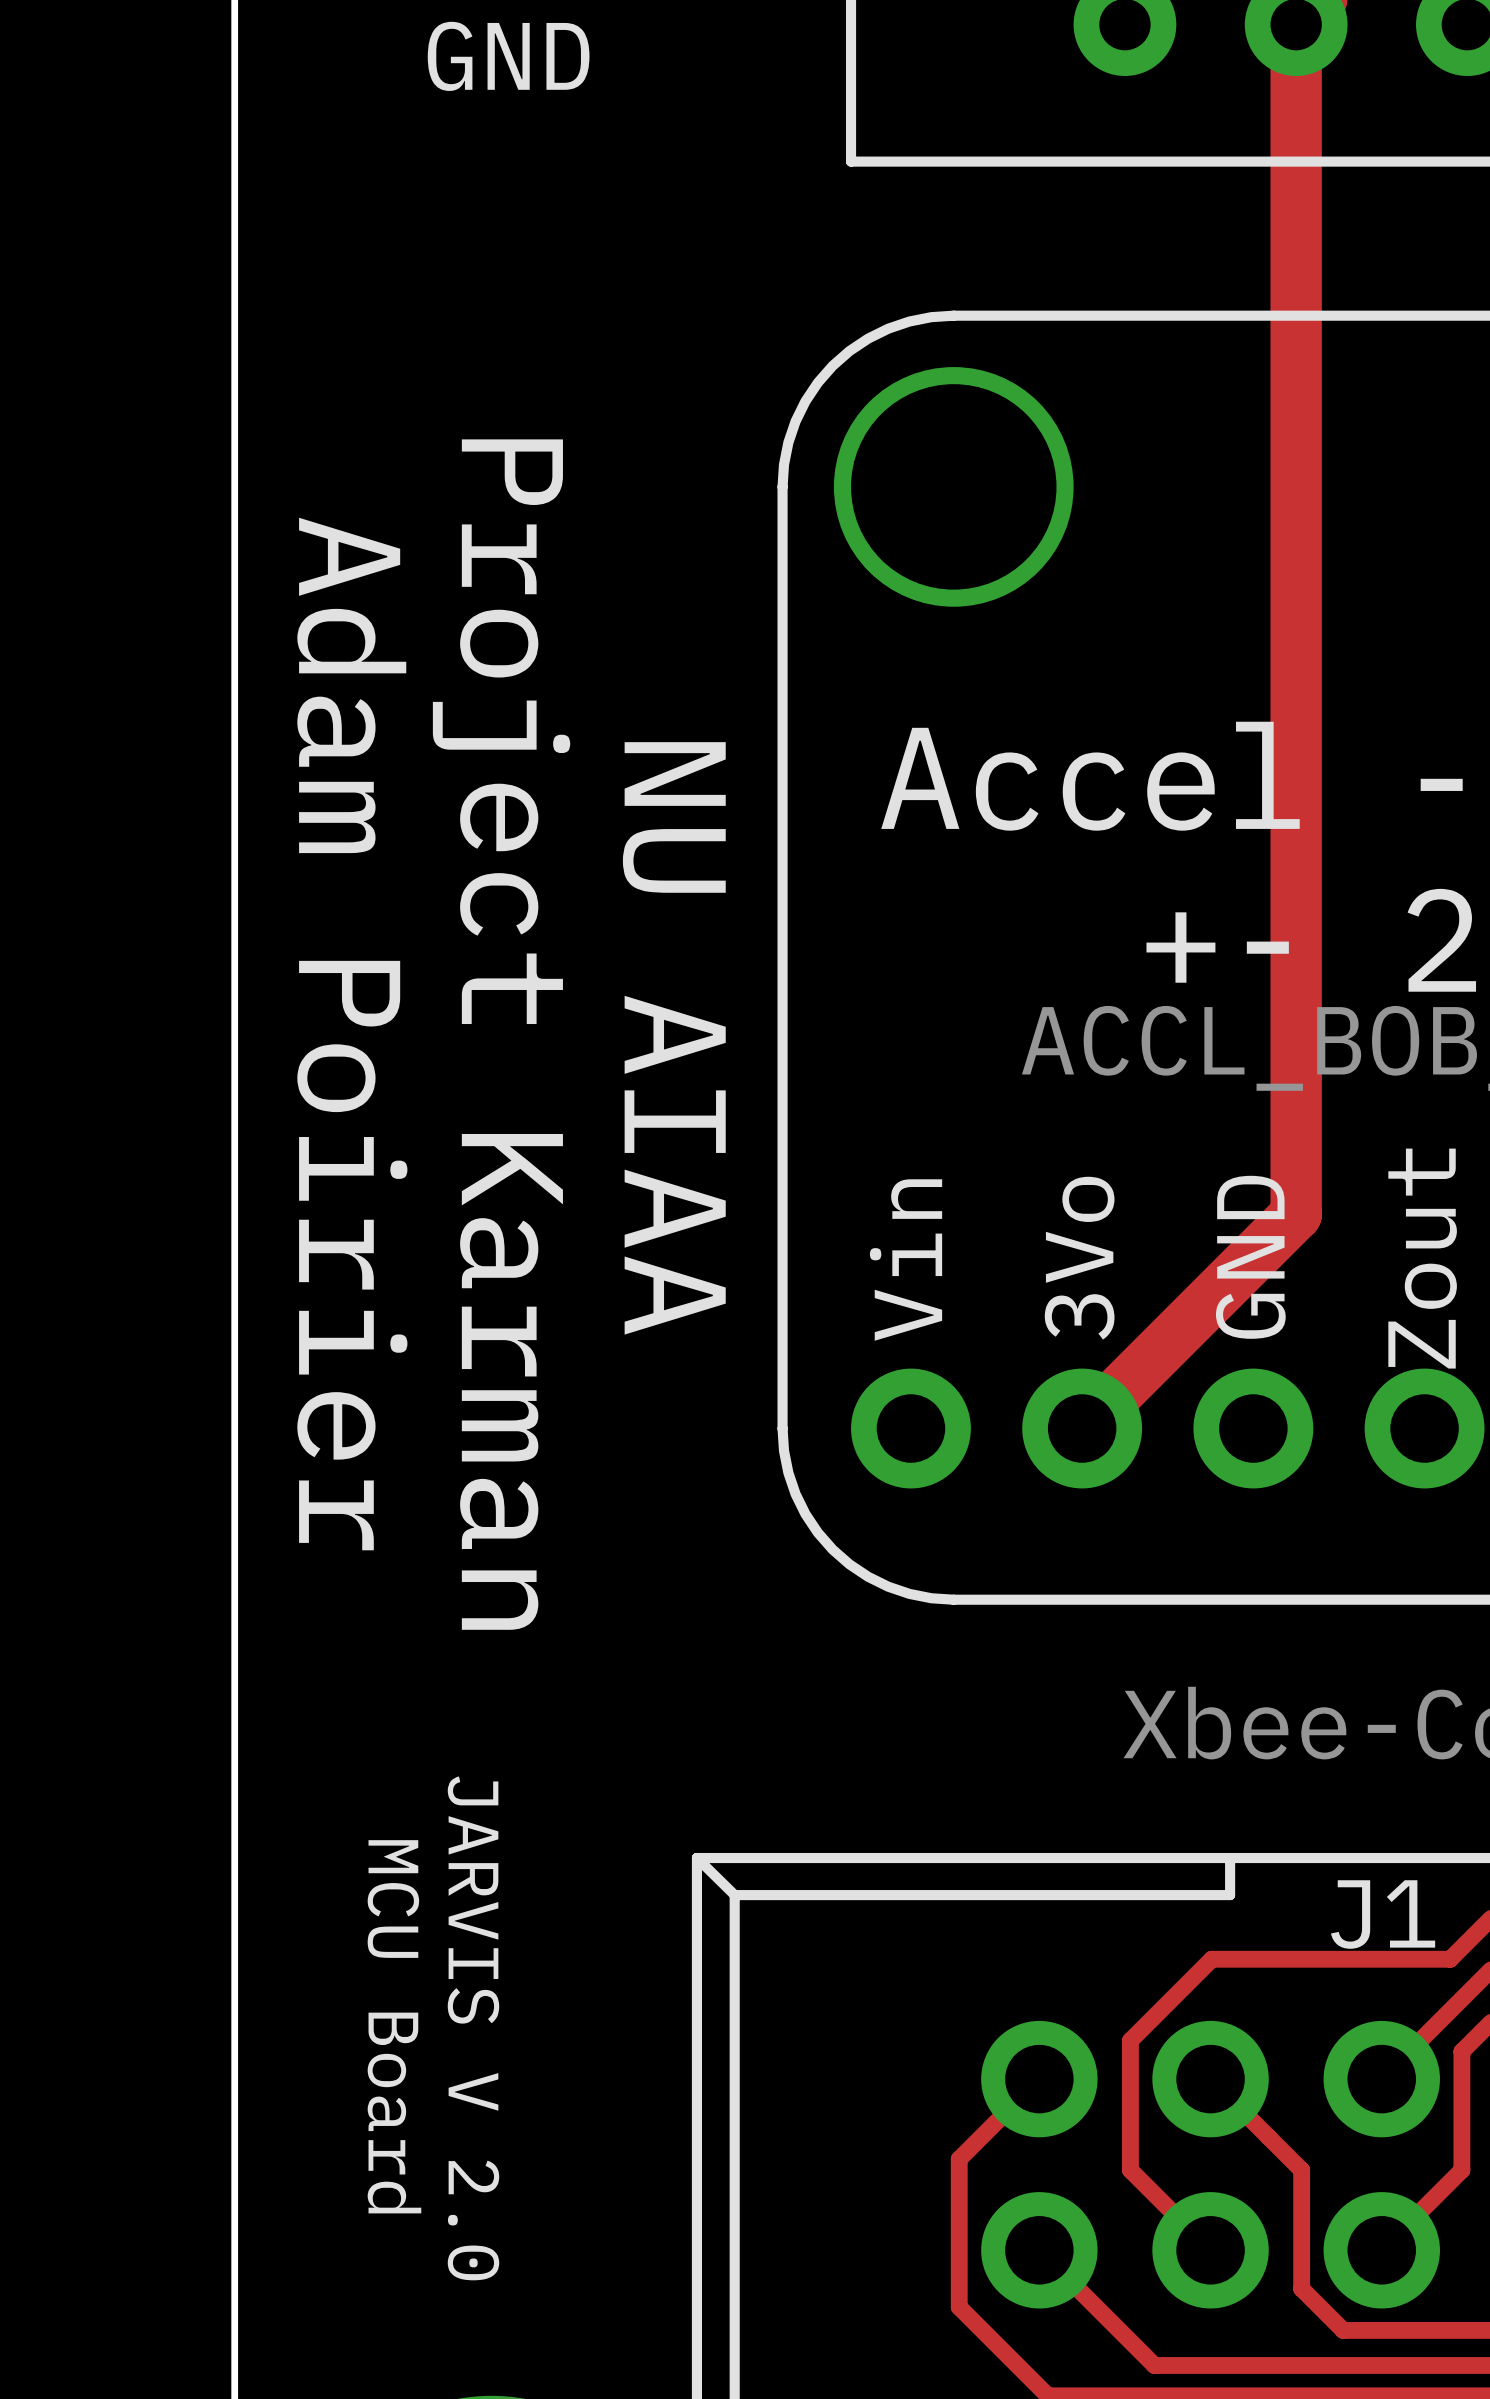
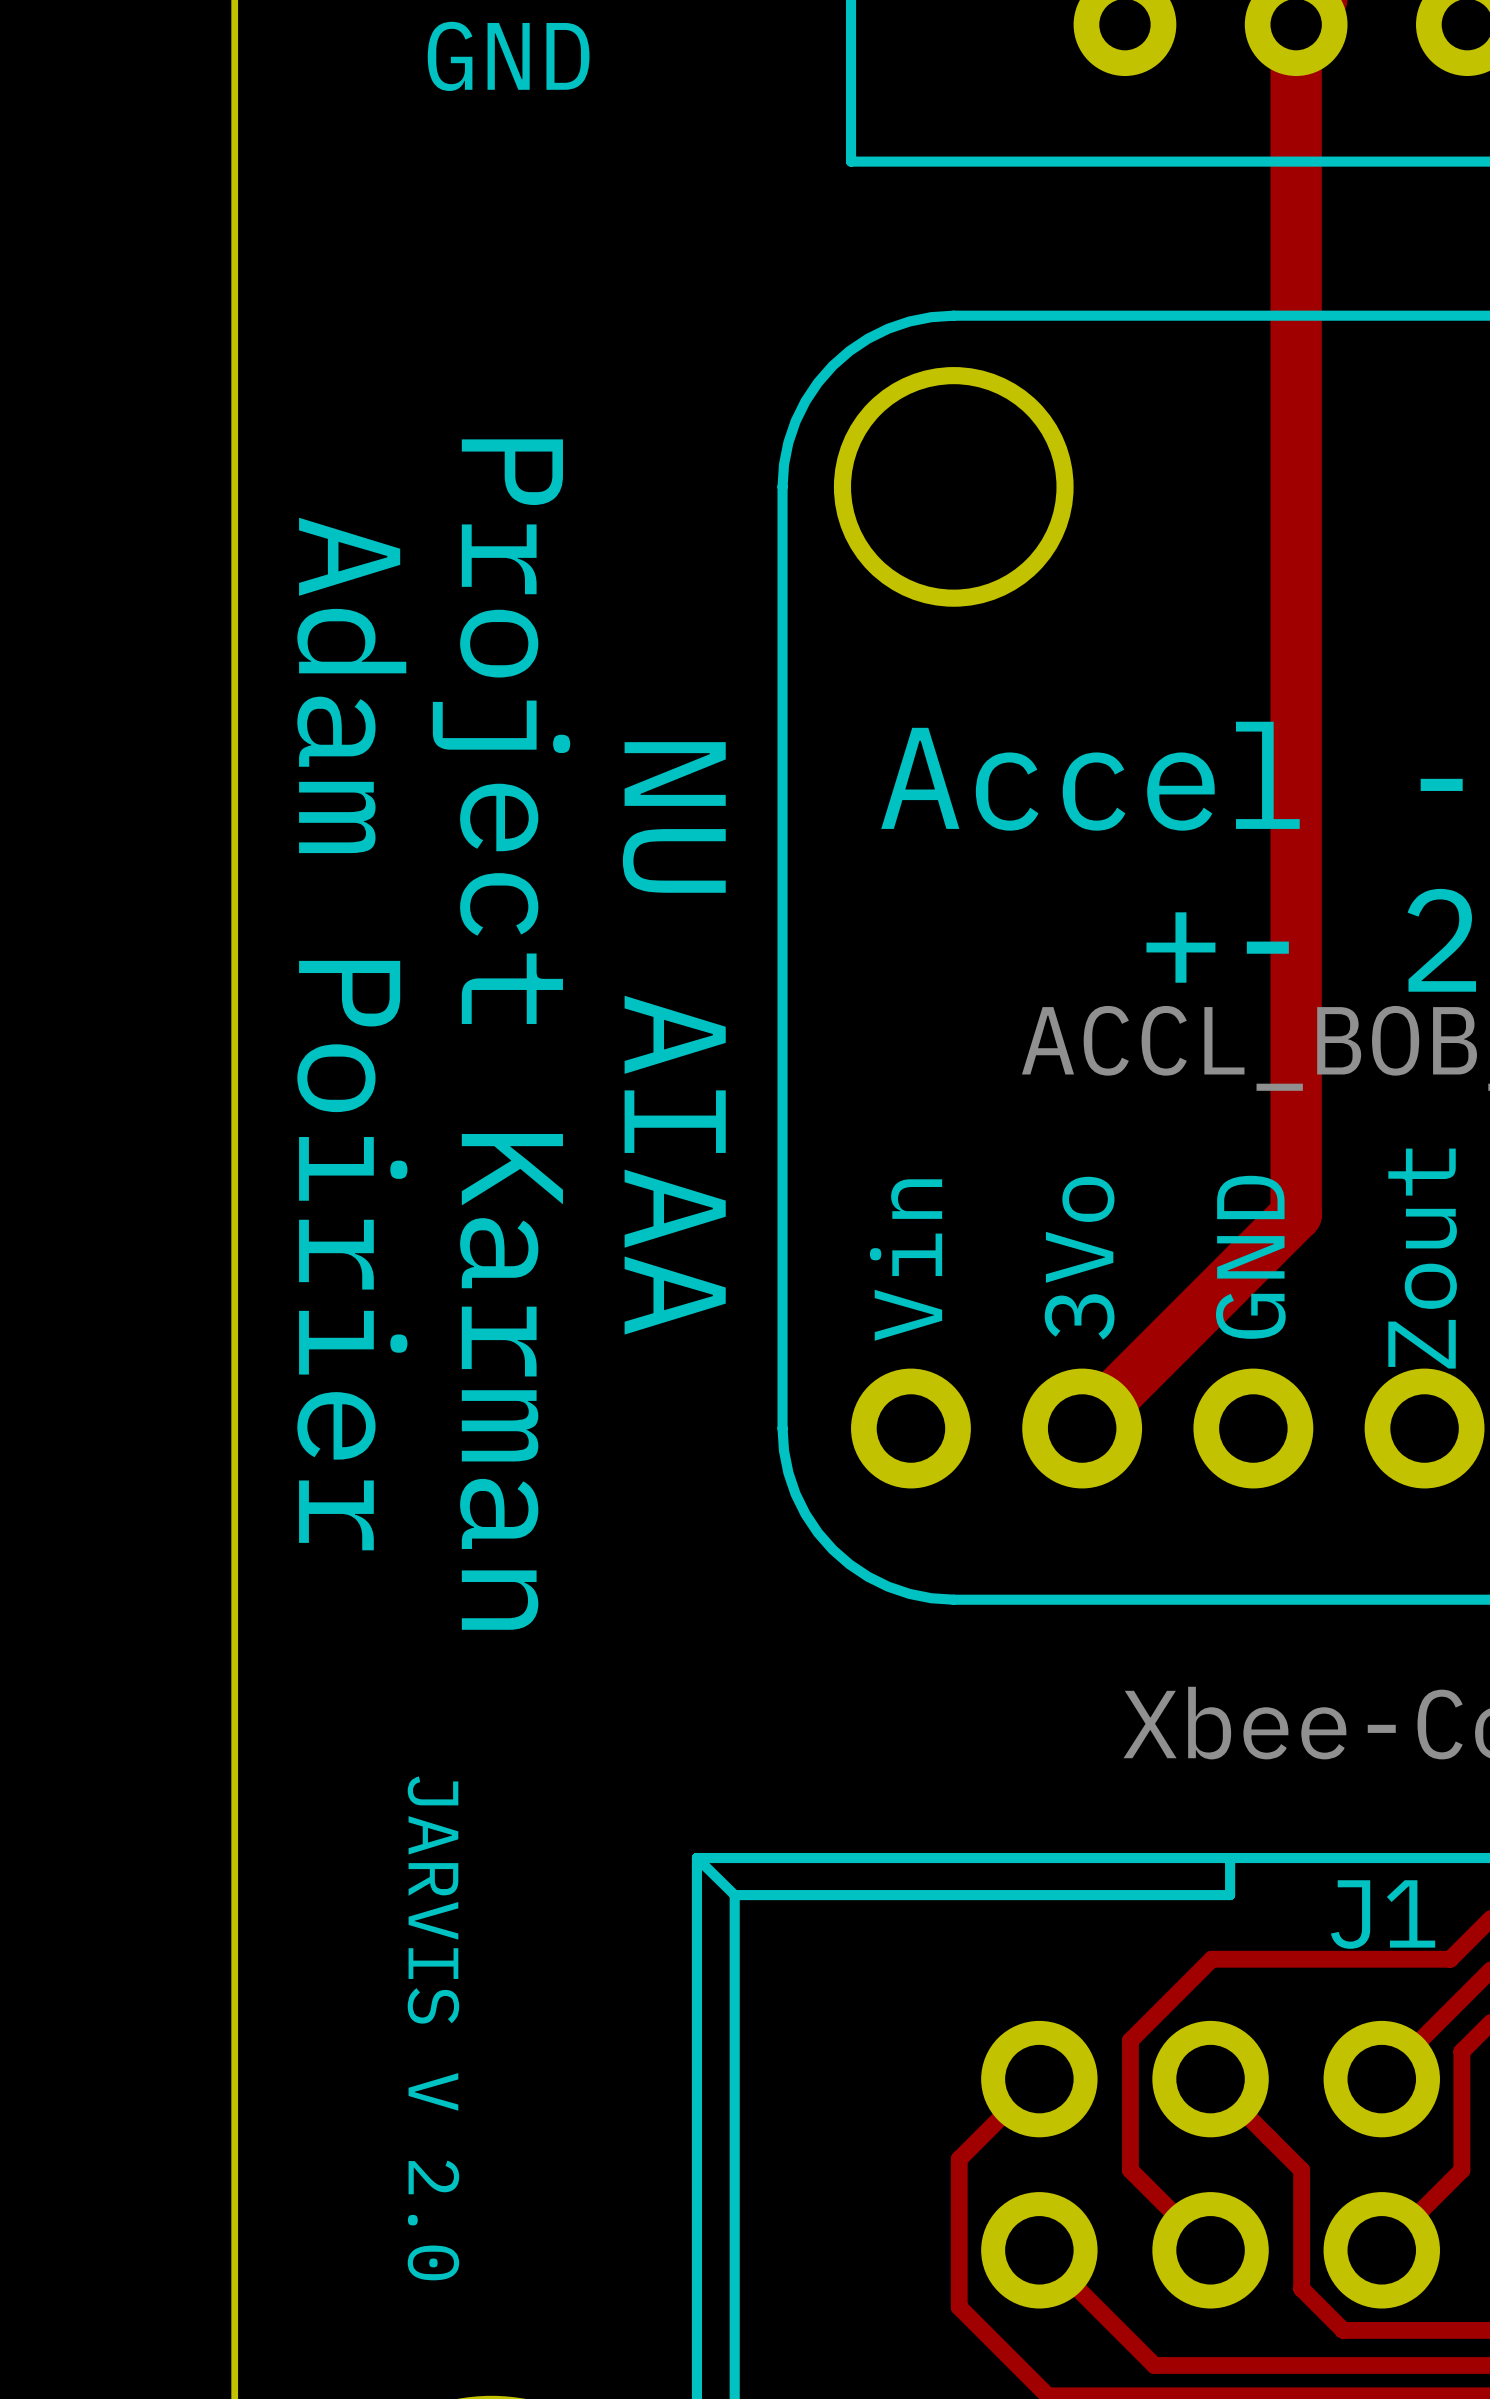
text: MCU Board (394, 2026) -> none
text position: JARVIS V 2.0 (473, 2028) -> JARVIS V 2.0 (433, 2028)

